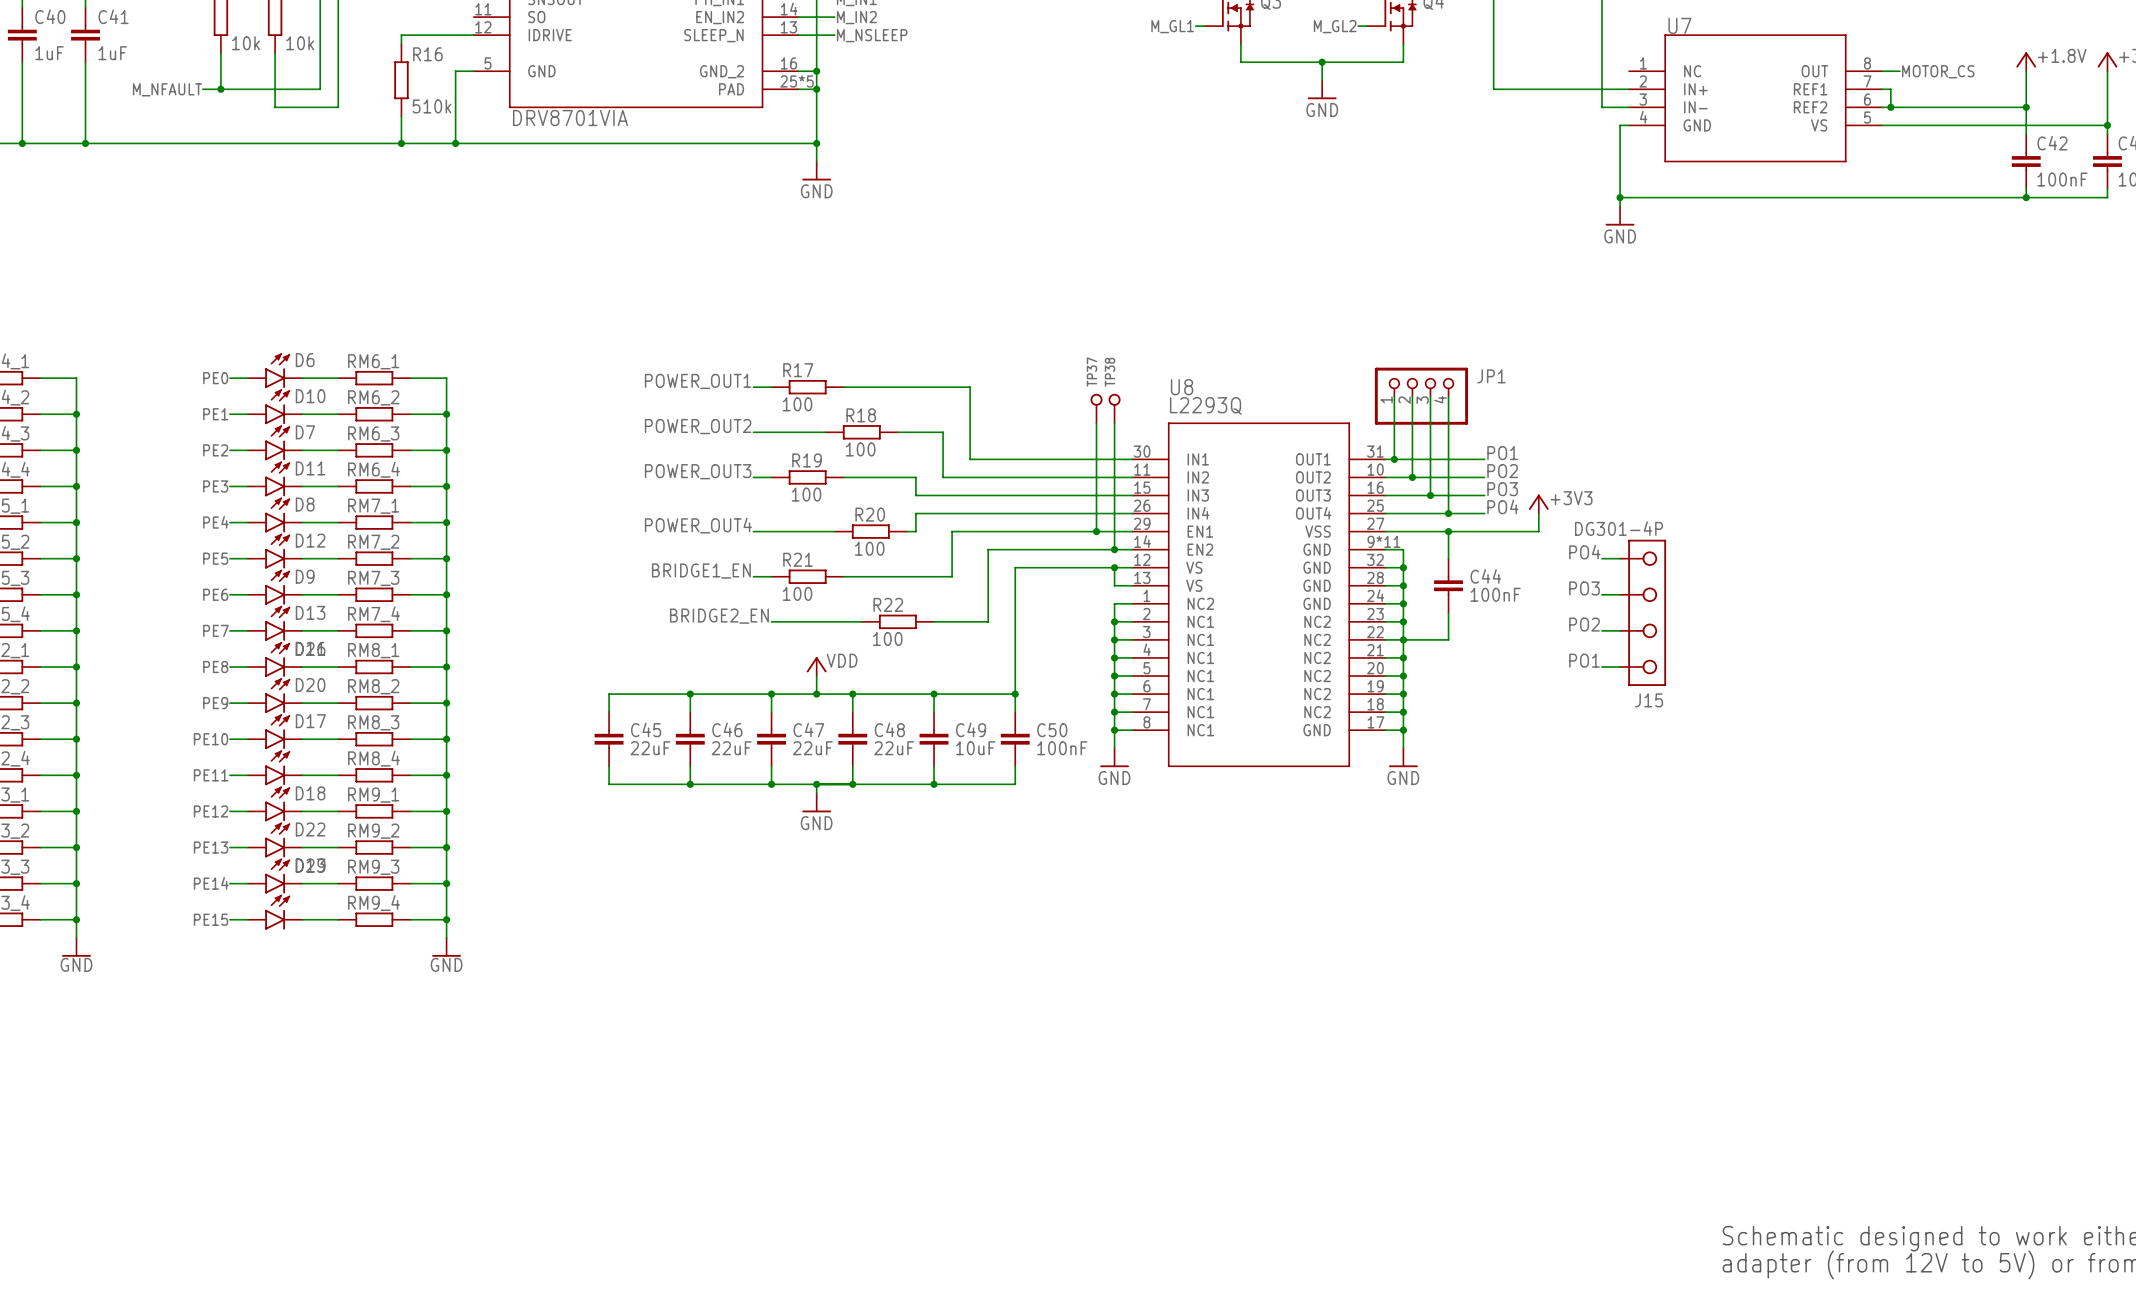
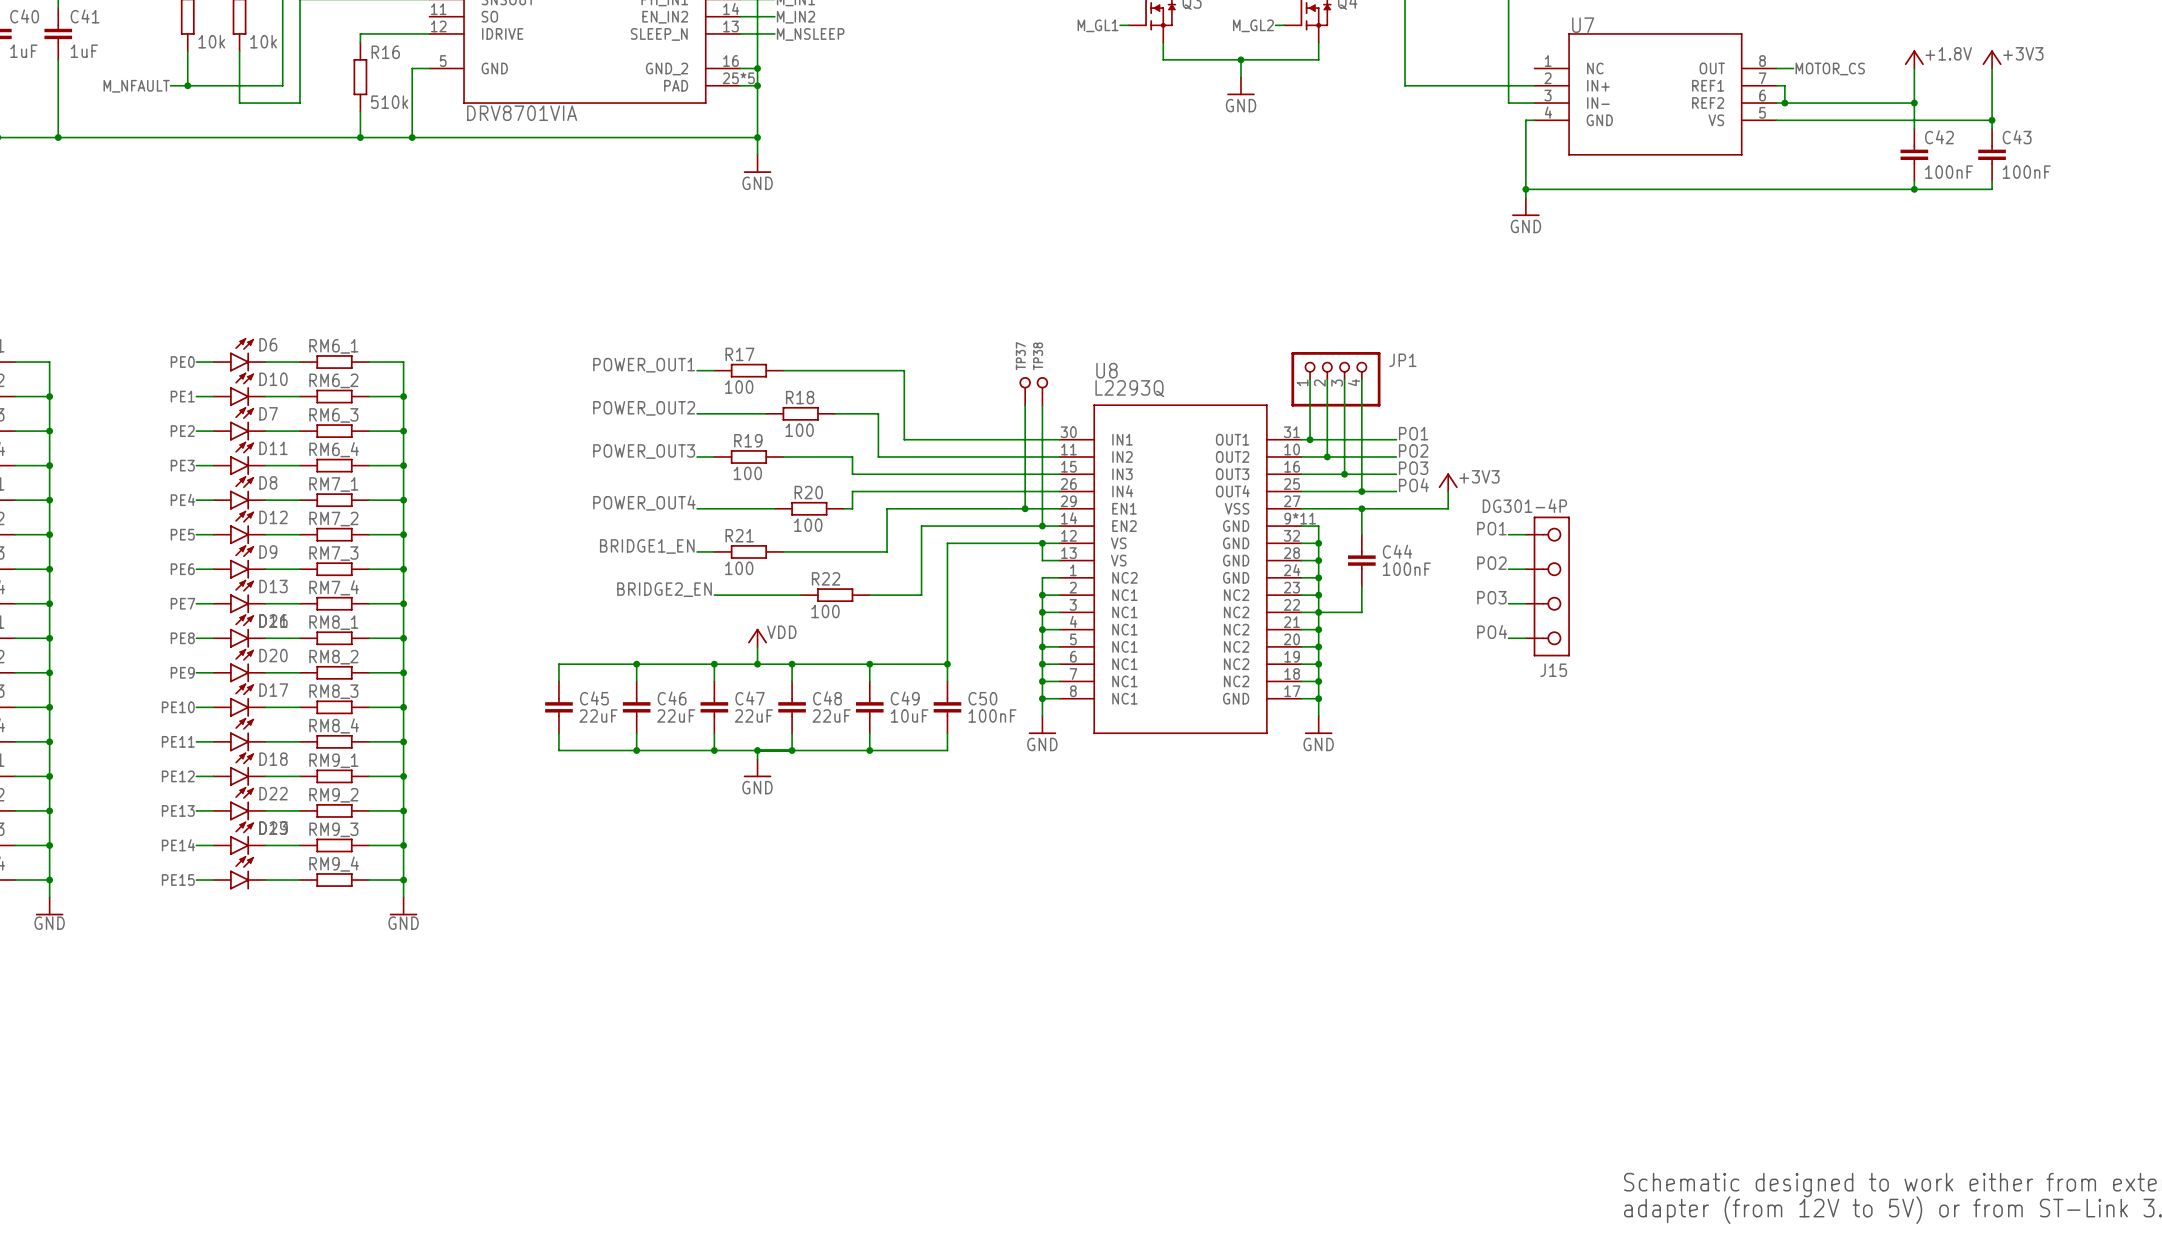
label: PO4 (1584, 552) -> PO1 (1491, 528)
label: PO3 (1584, 588) -> PO2 (1491, 563)
label: PO2 (1584, 624) -> PO3 (1491, 597)
label: PO1 (1584, 660) -> PO4 (1492, 631)

